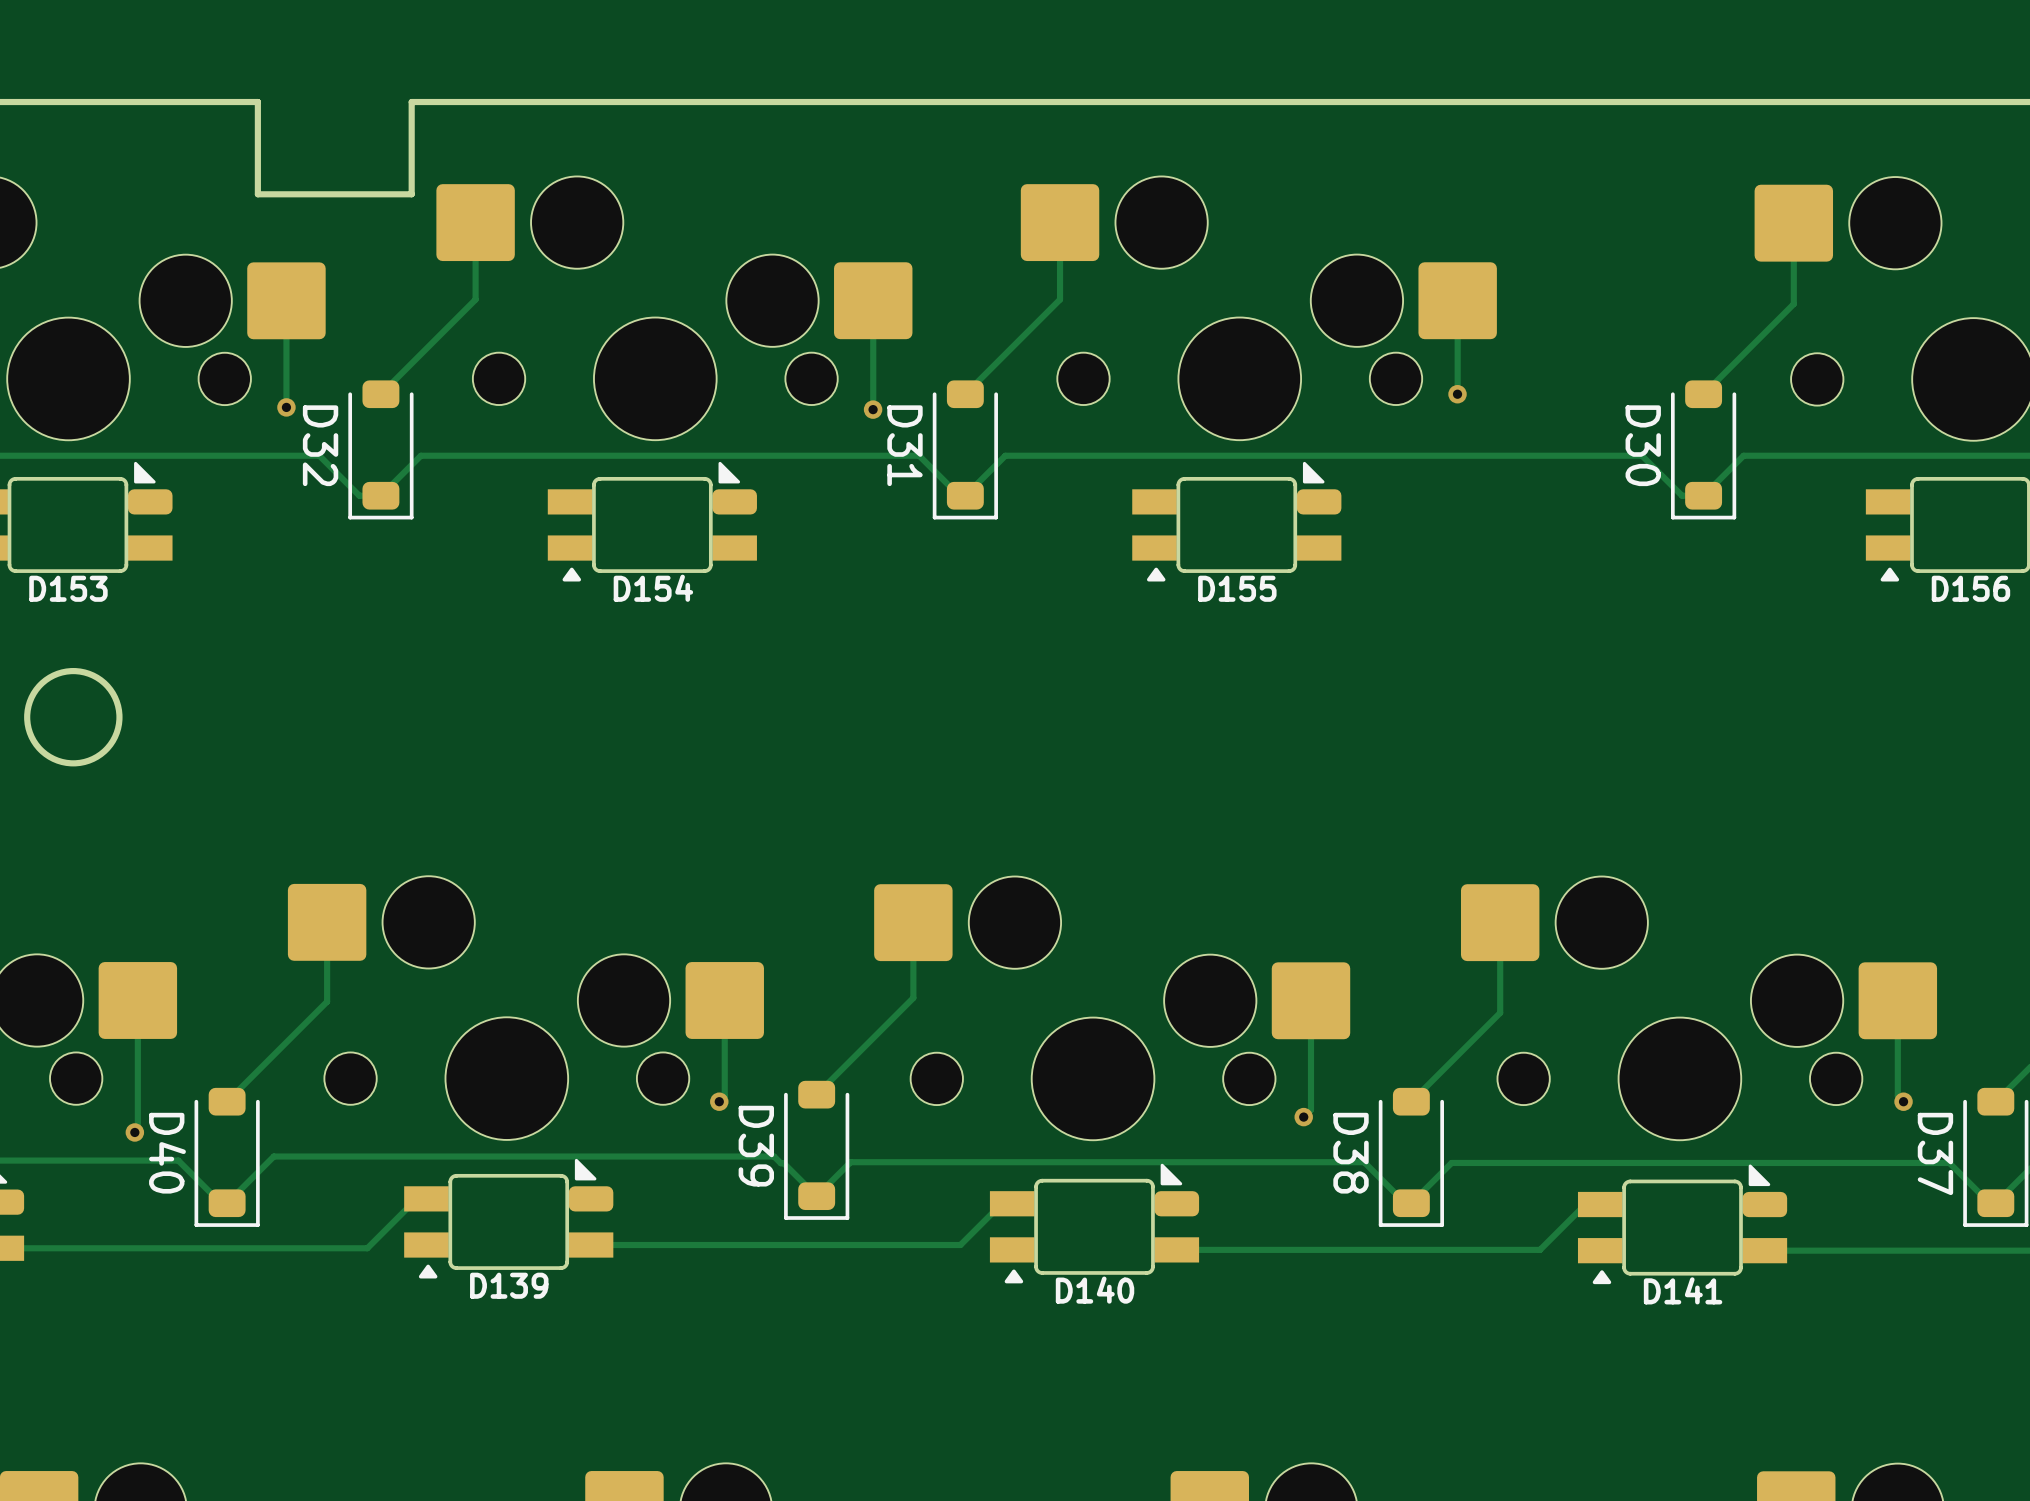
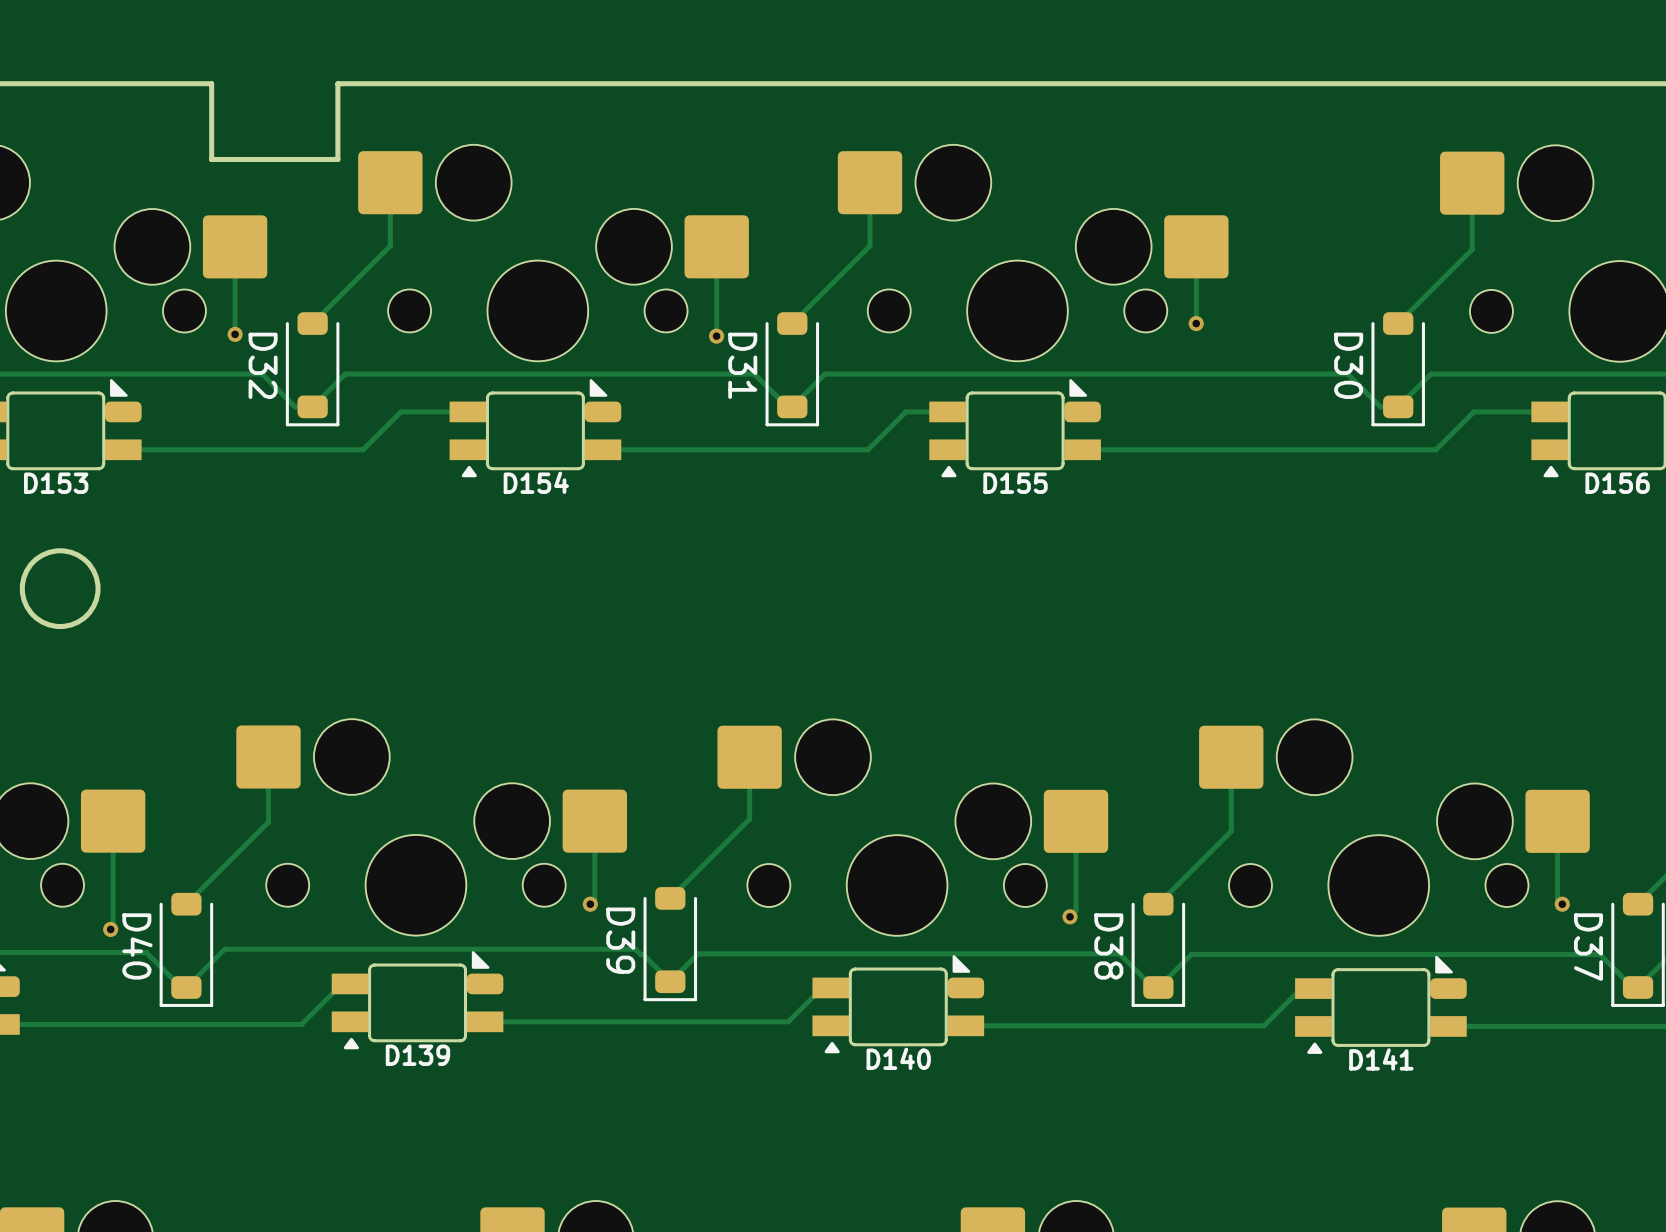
track: none -> (467, 411) (401, 411) (363, 449) (123, 449)
track: none -> (947, 411) (905, 411) (868, 449) (602, 449)
track: none -> (1549, 411) (1473, 411) (1436, 449) (1082, 449)

